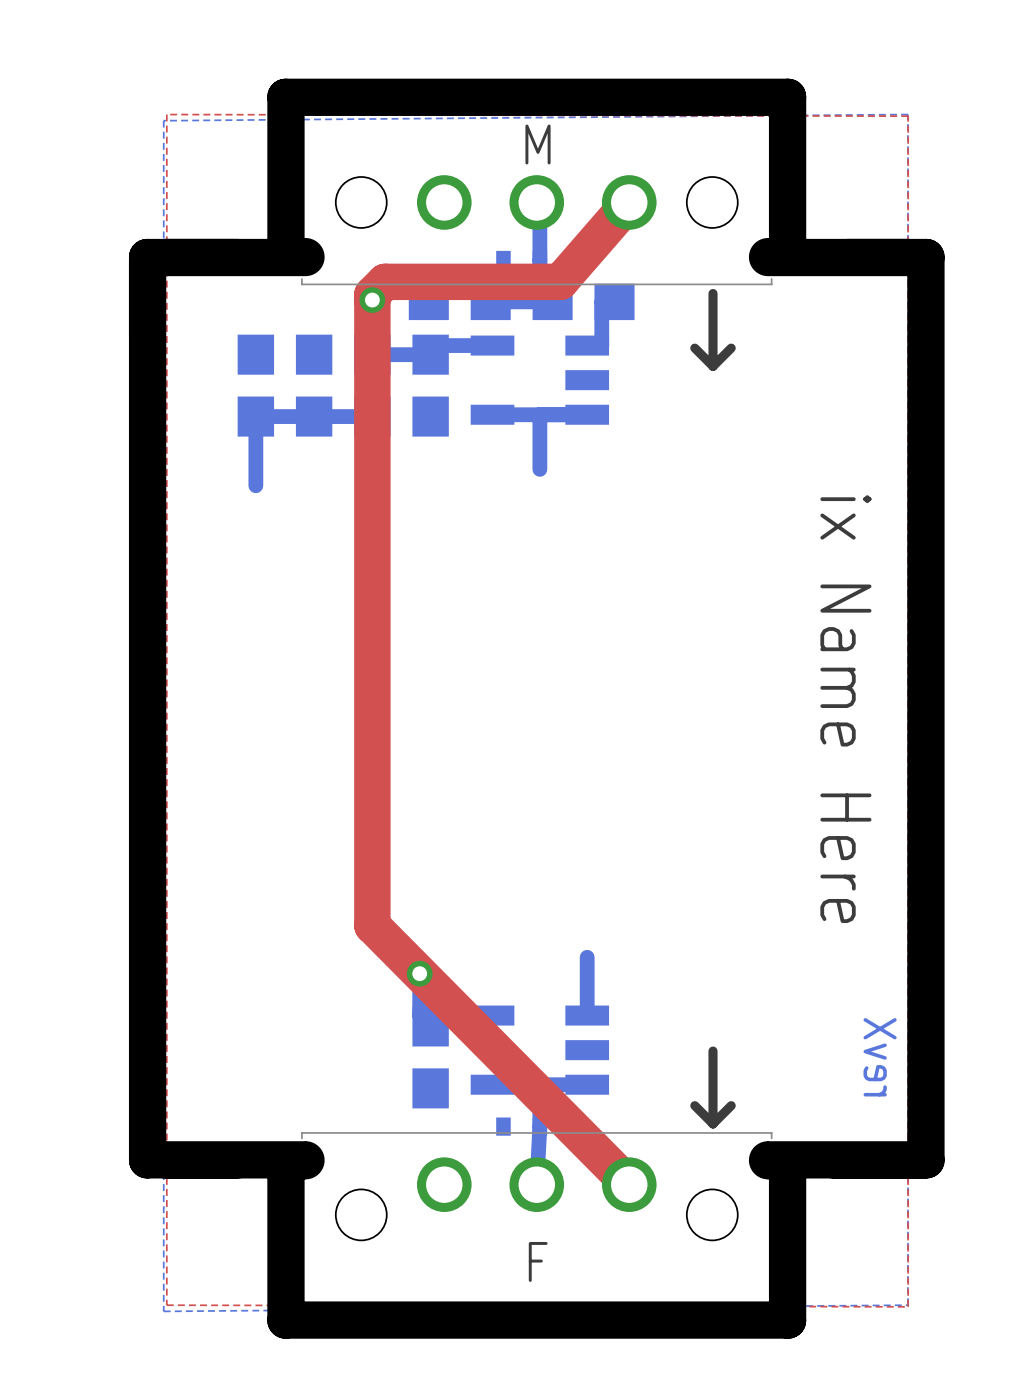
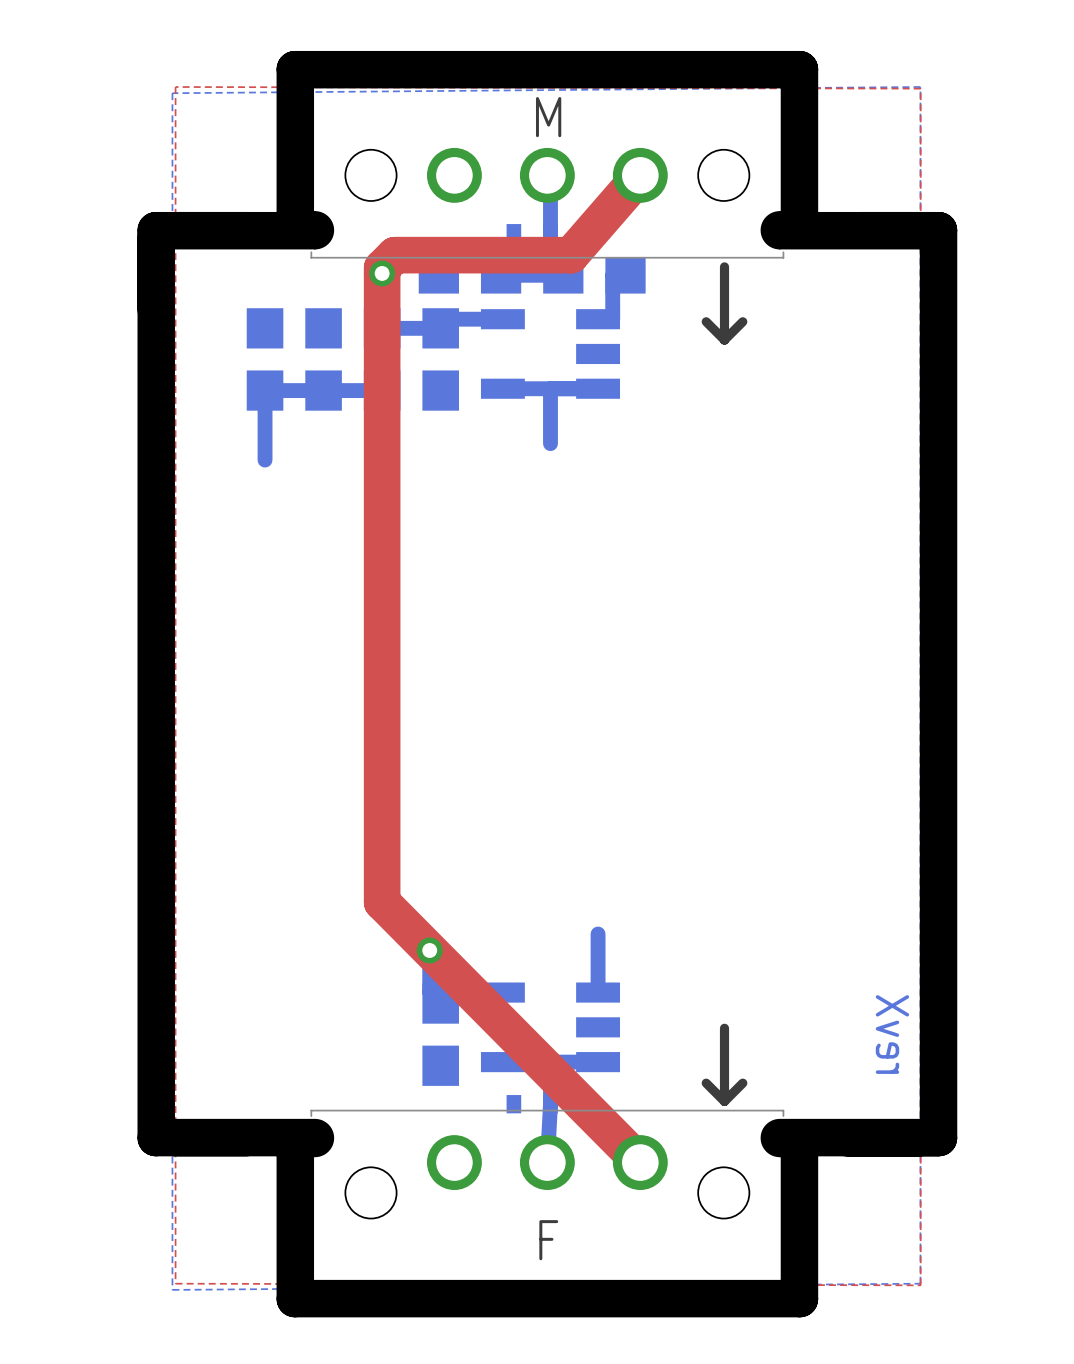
text: ix Name Here (845, 709) -> none

